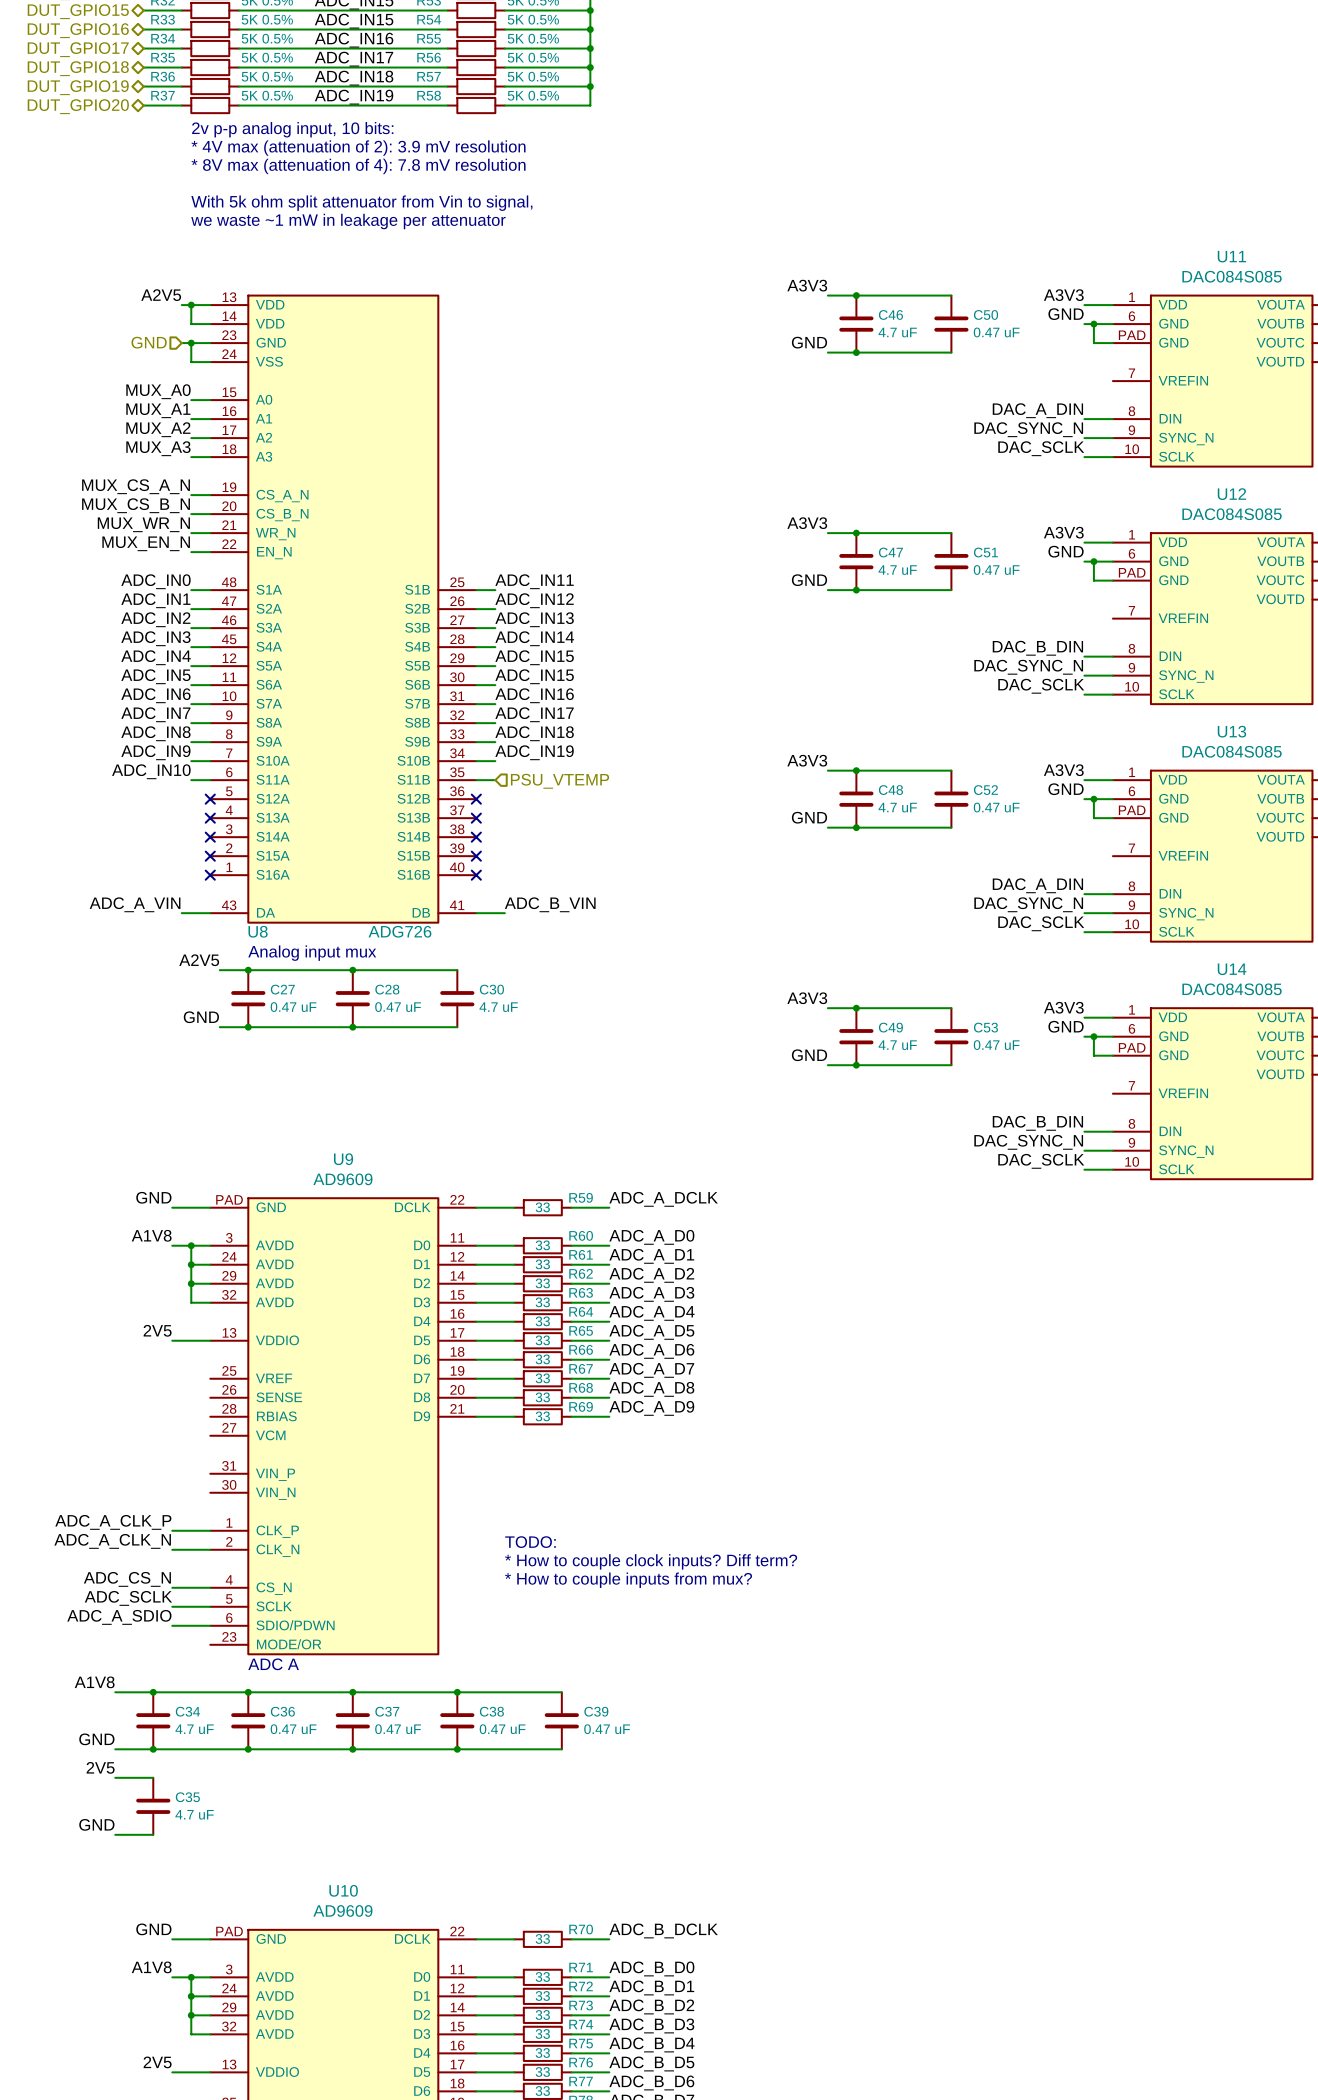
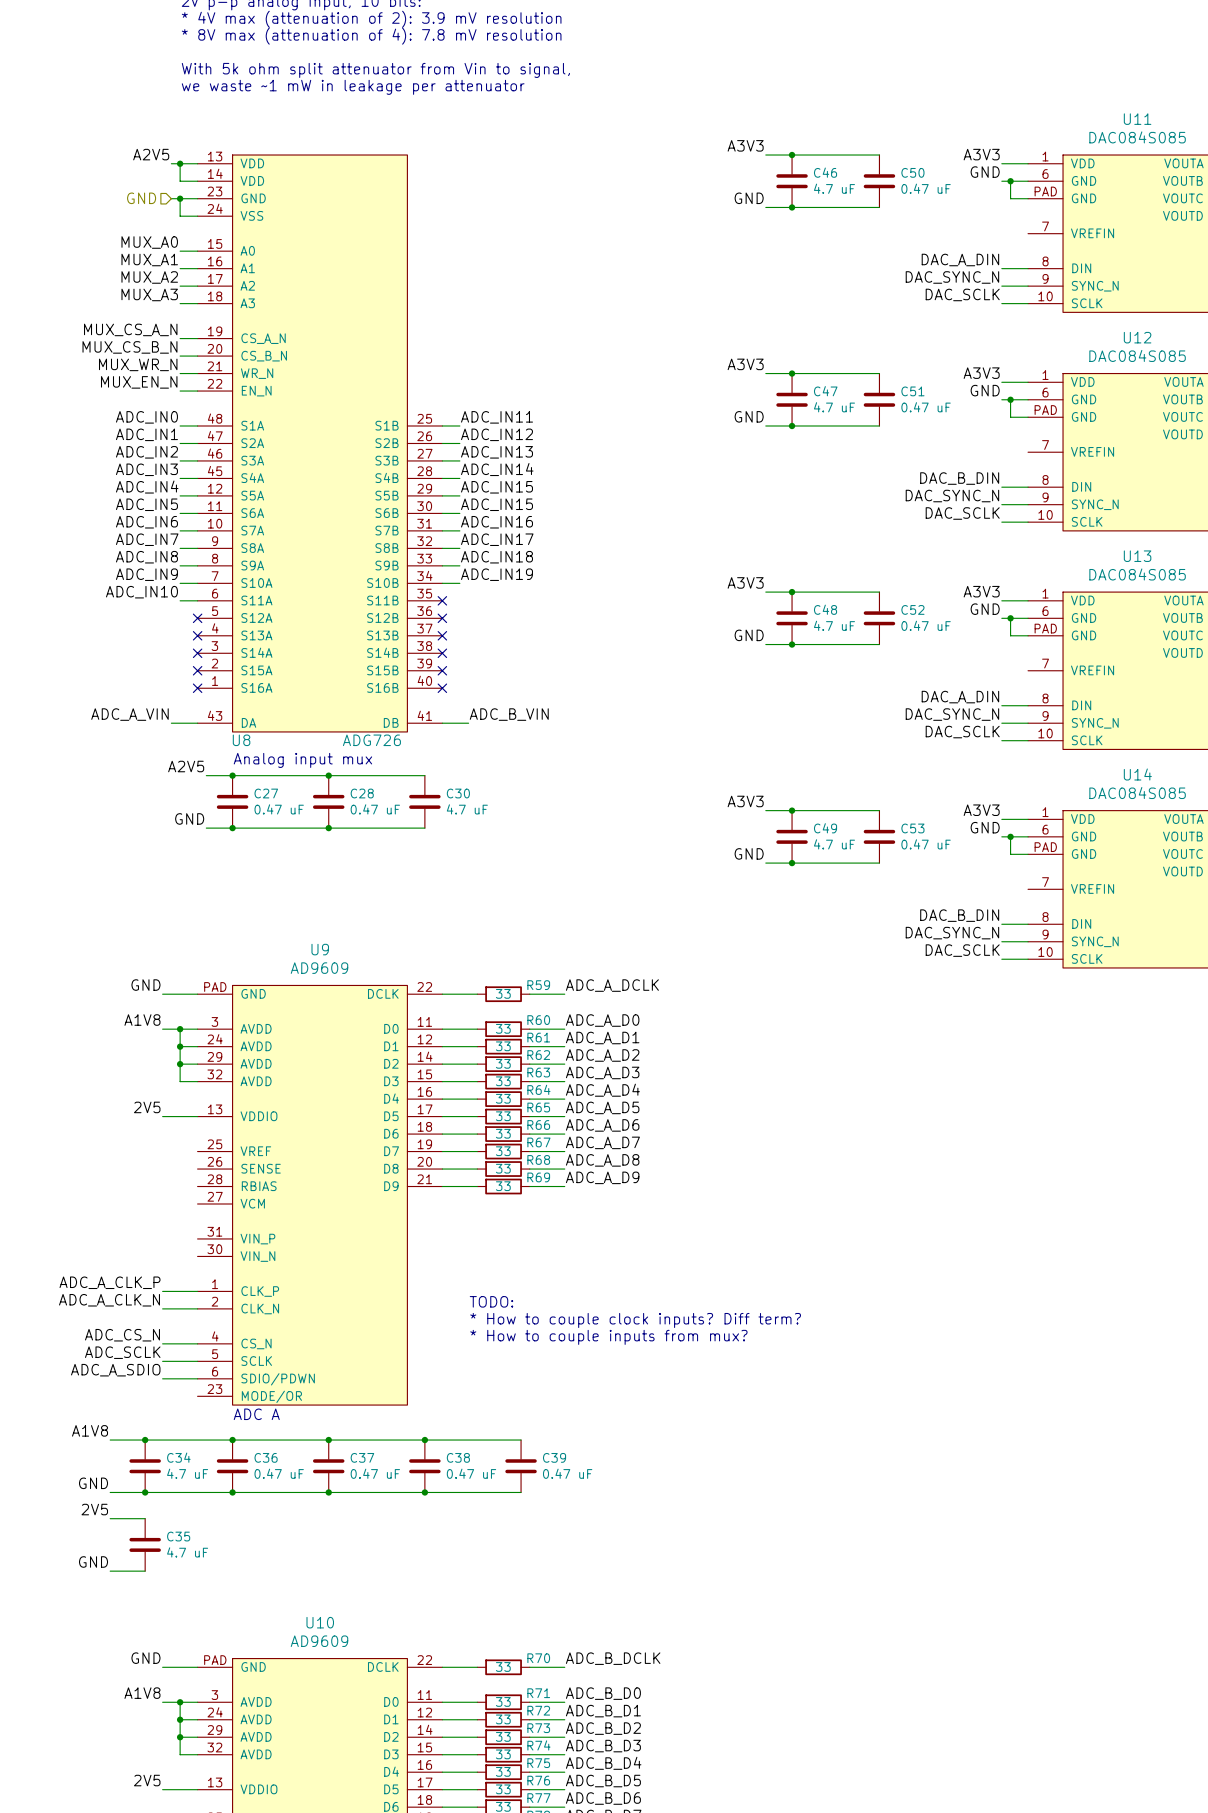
wire: (476, 780) (495, 780) -> none
no-connect mark: none -> (442, 600)
hierarchical label: PSU_VTEMP (560, 781) -> none

